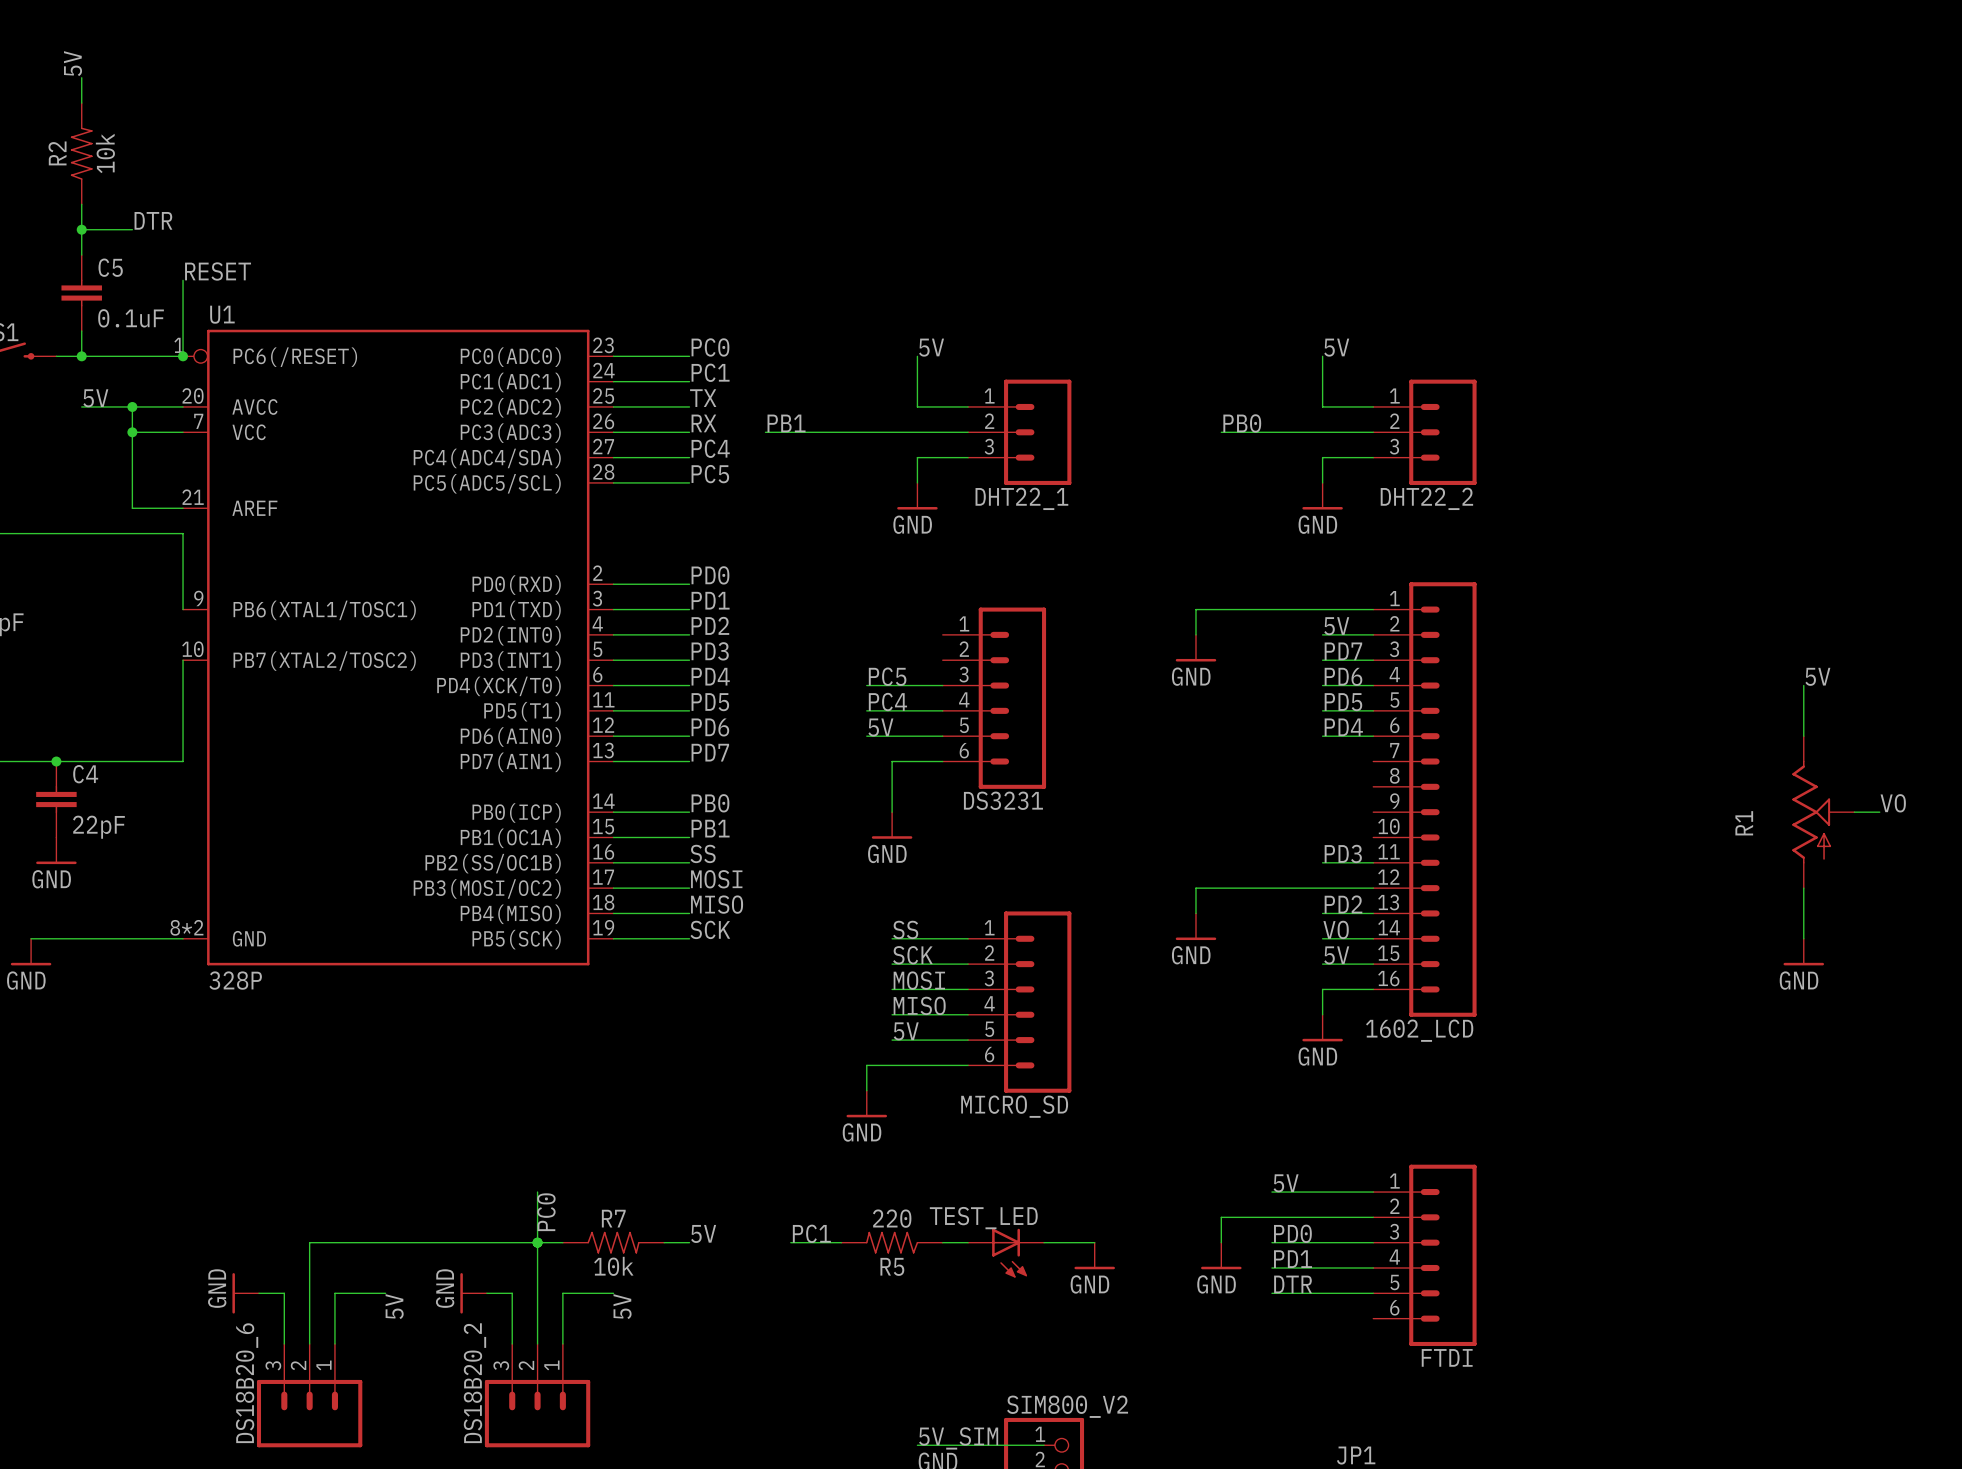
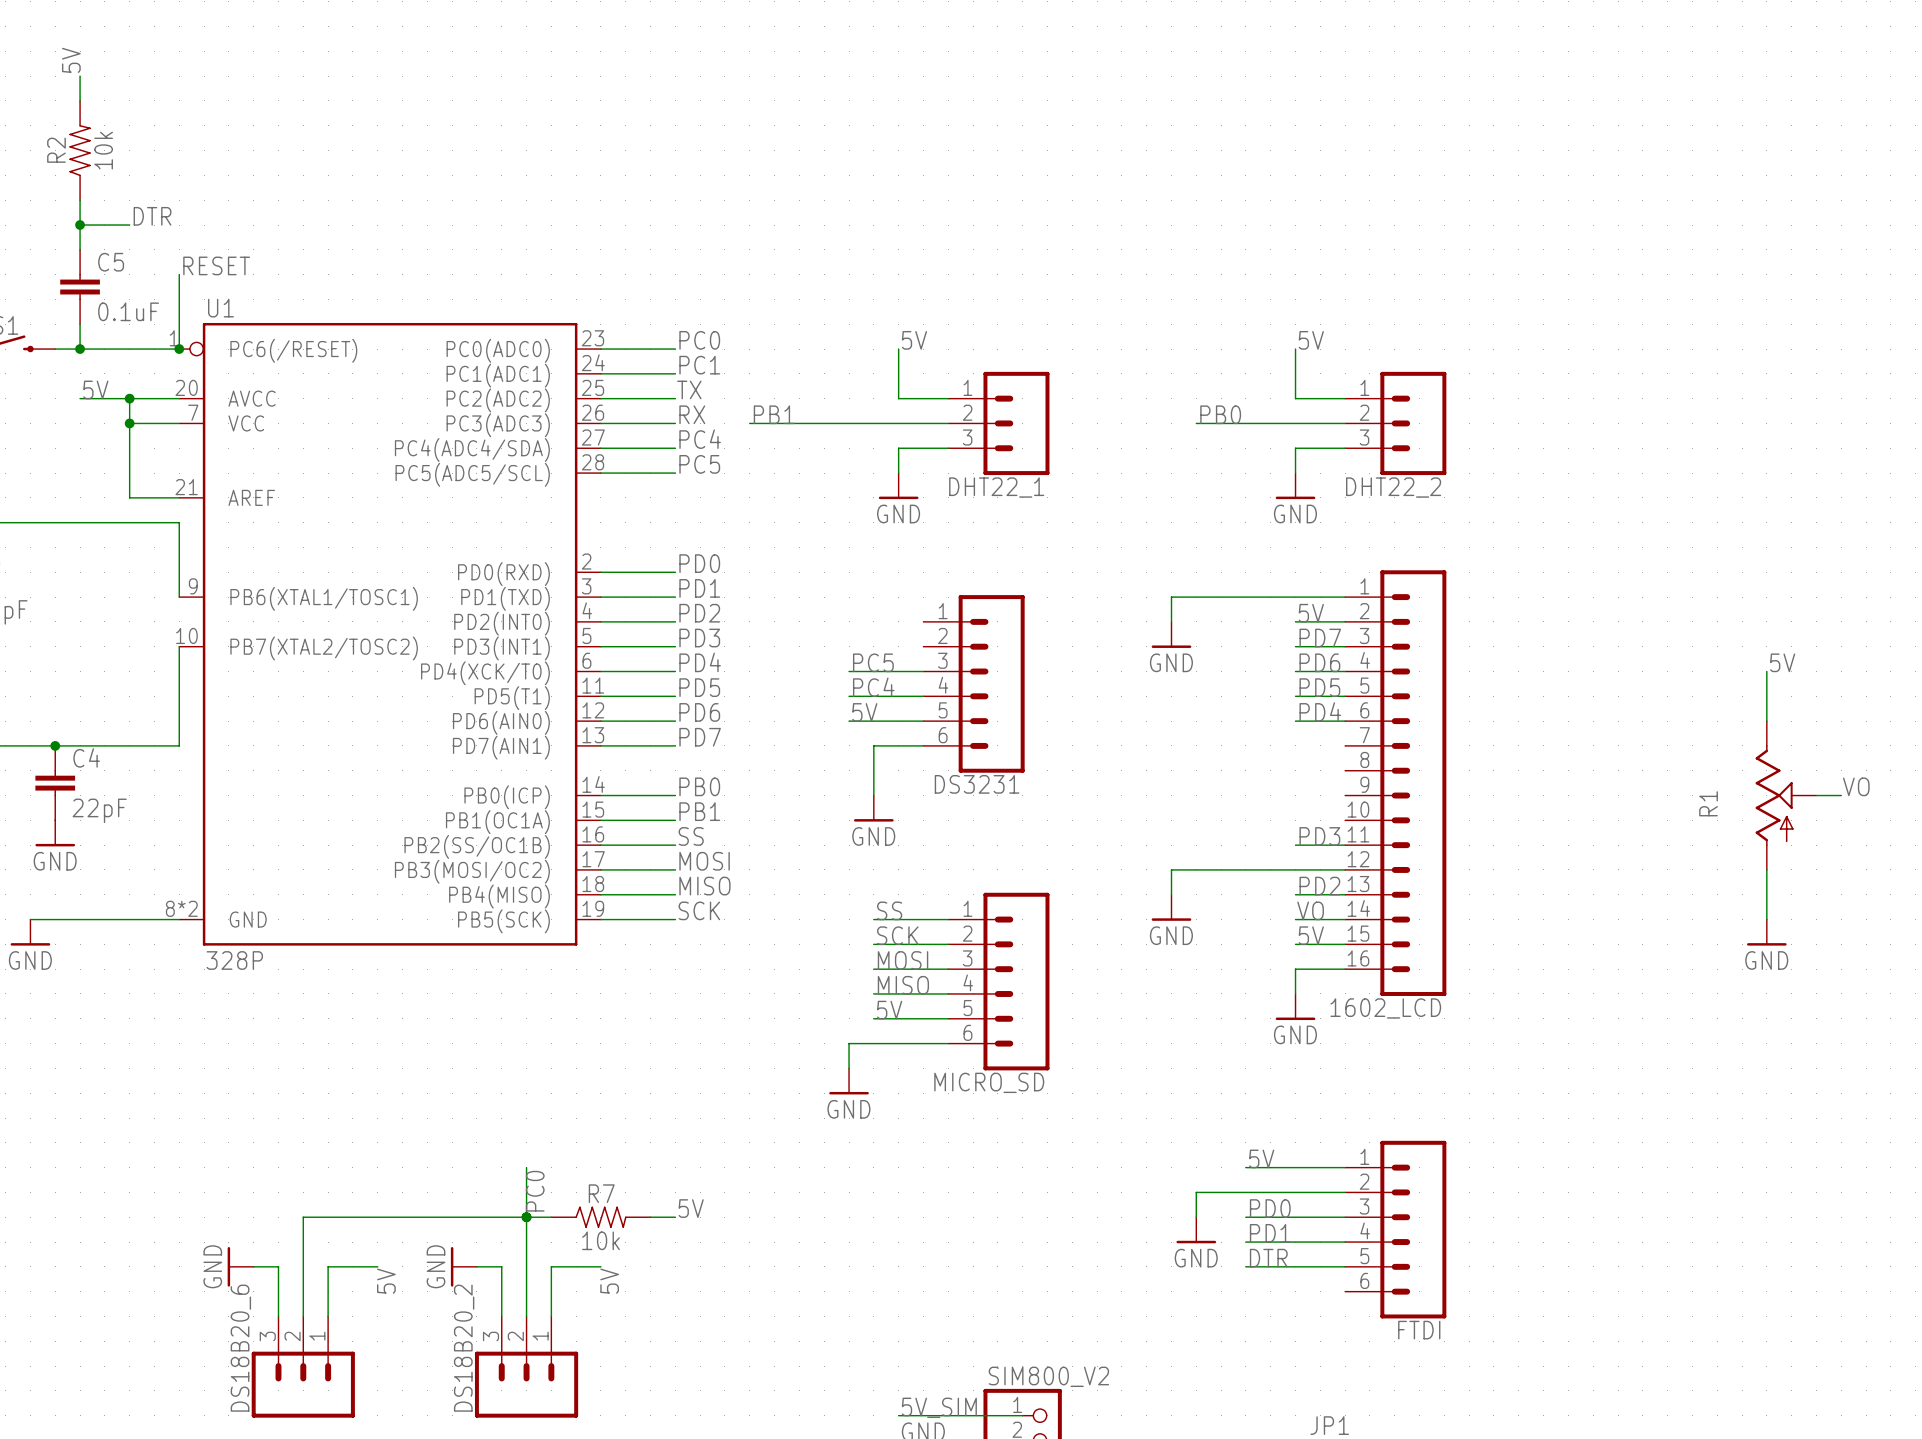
label: PC1 (811, 1233) -> none
wire: (790, 1242) (841, 1242) -> none
R5: 220 (892, 1242) -> none
wire: (942, 1242) (968, 1242) -> none
wire: (1044, 1242) (1094, 1242) -> none
TEST_LED: (1006, 1253) -> none
power symbol: GND (1094, 1255) -> none

